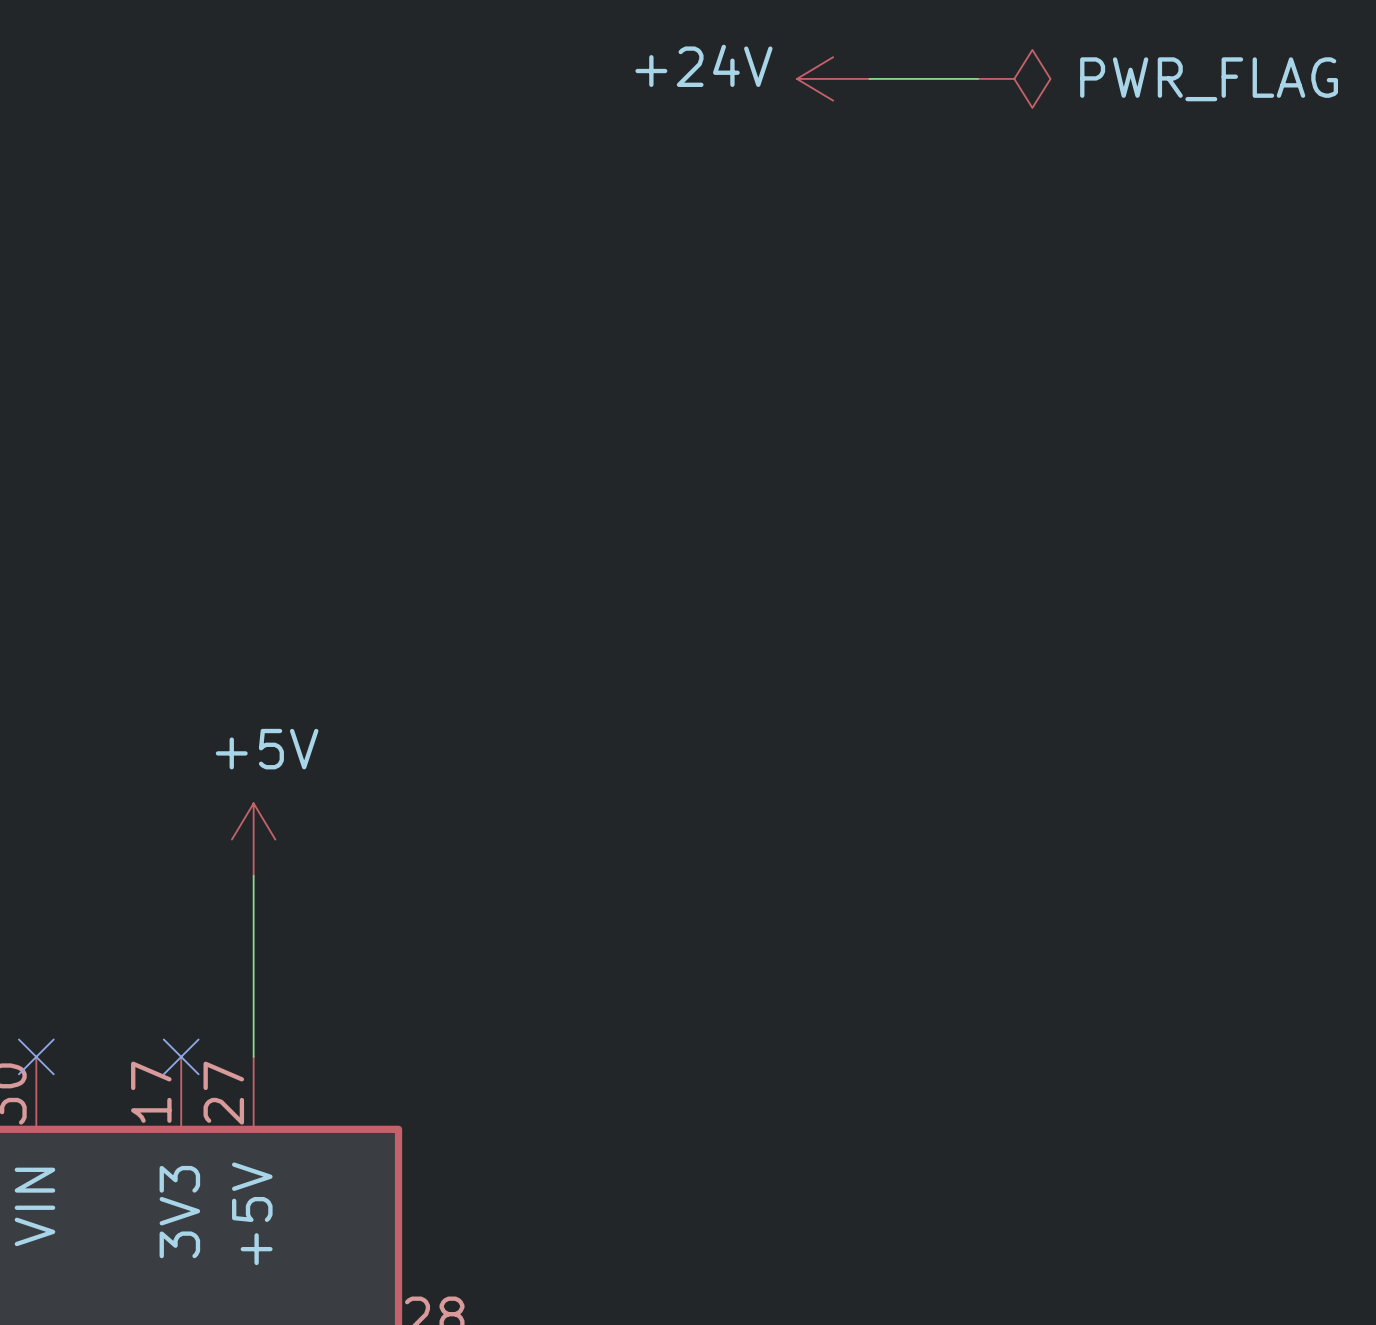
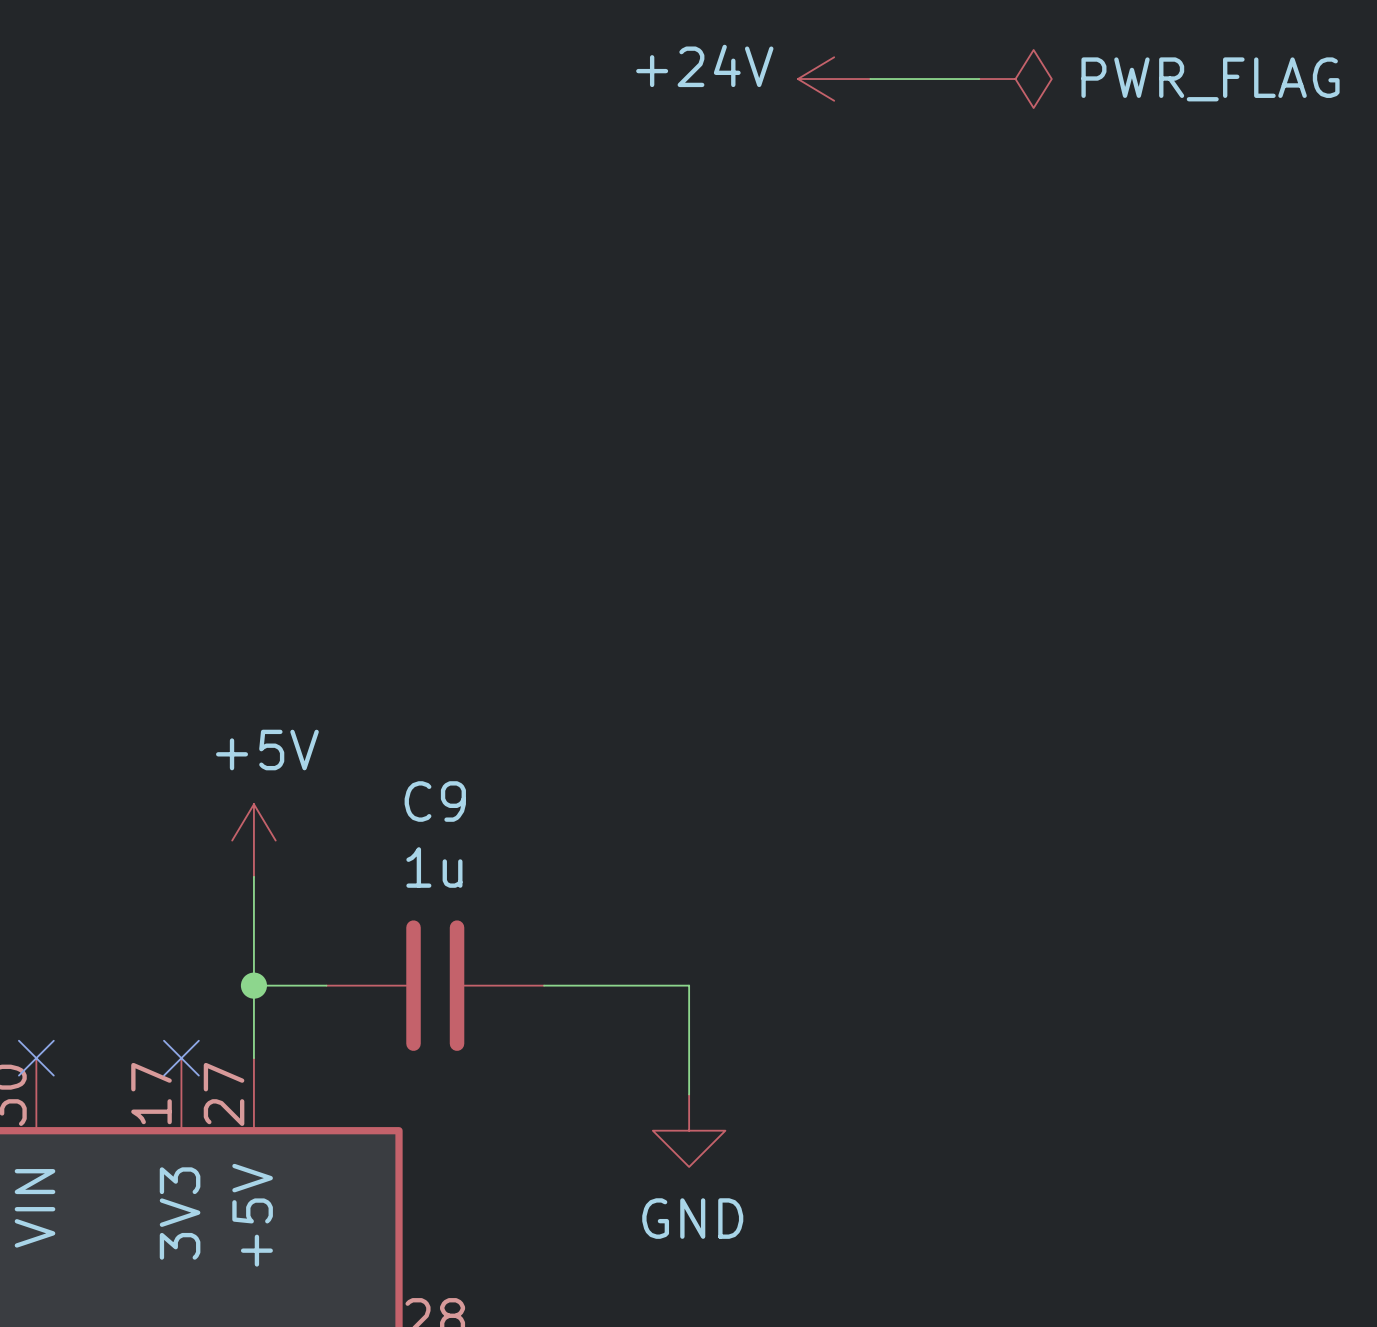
wire: none -> (253, 985) (326, 985)
junction: none -> (253, 985)
C9: none -> 1u (435, 985)
wire: none -> (544, 985) (689, 985) (689, 1094)
power symbol: none -> GND (689, 1130)

